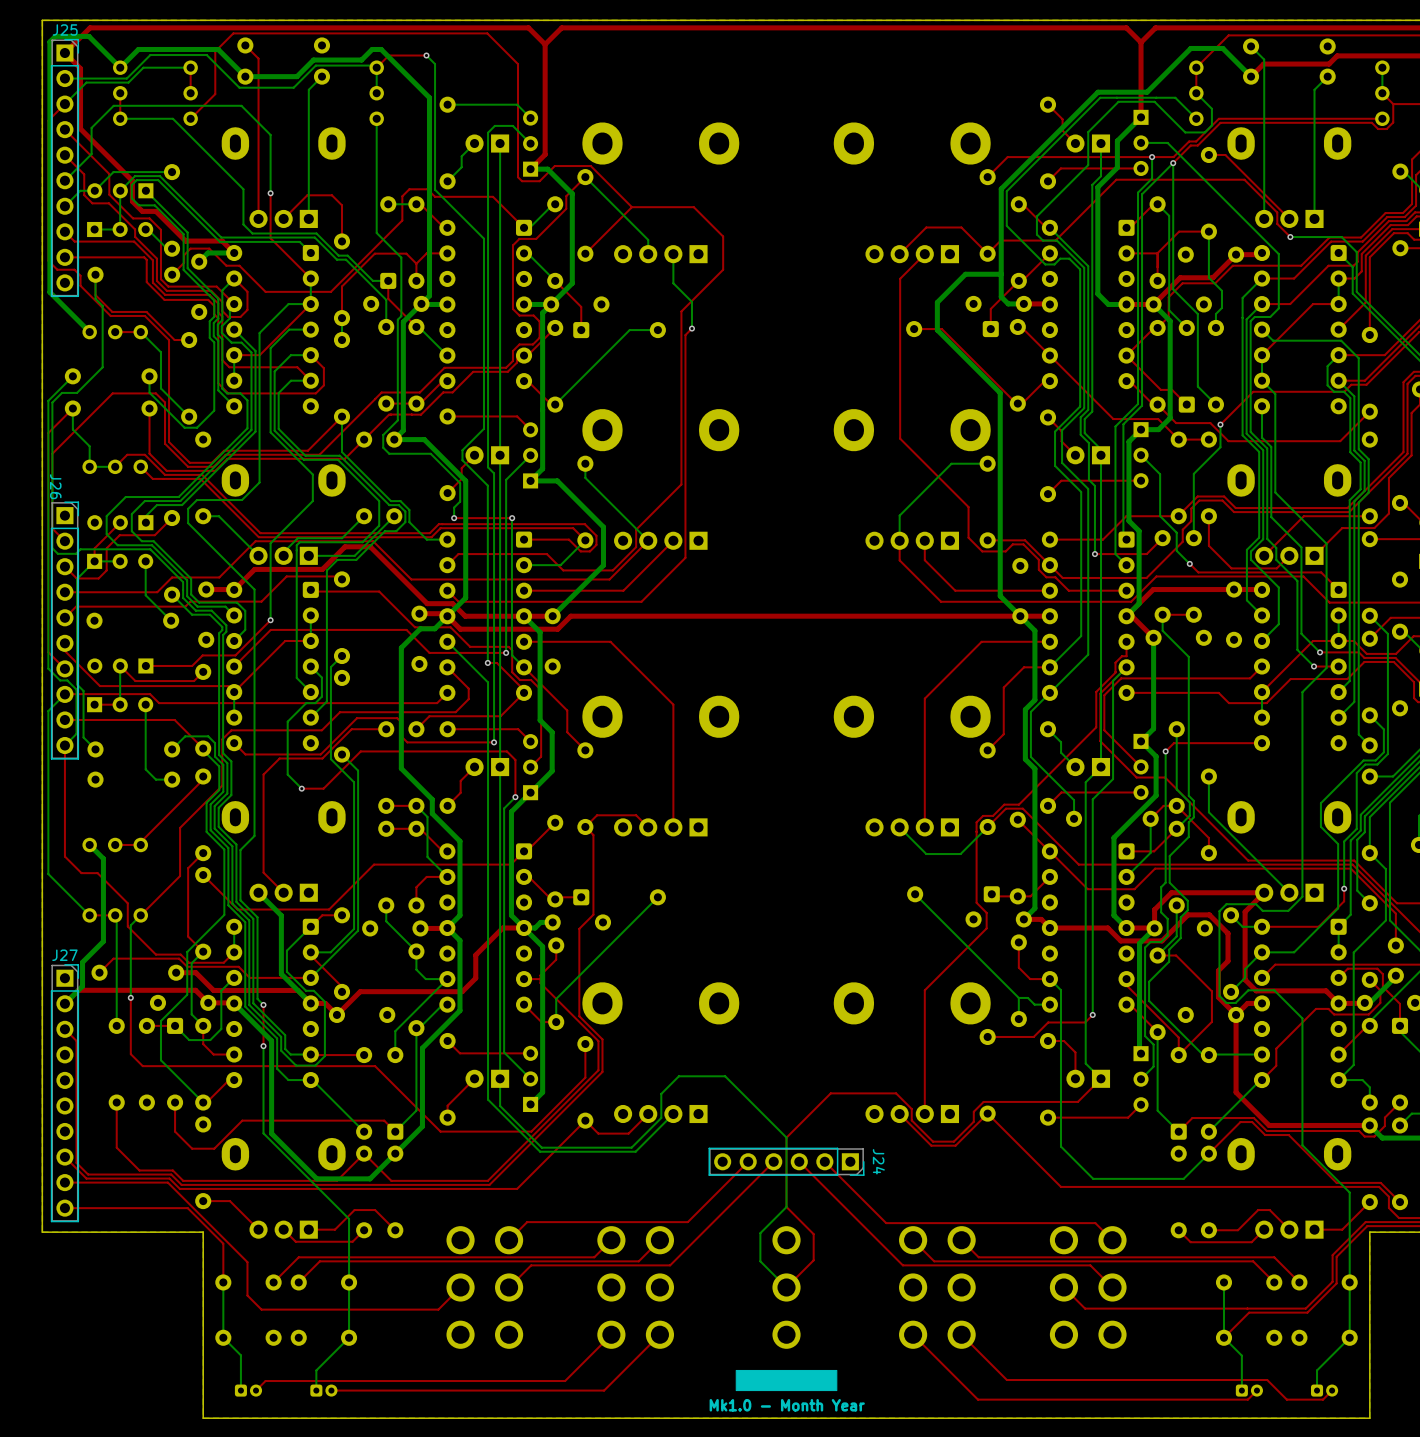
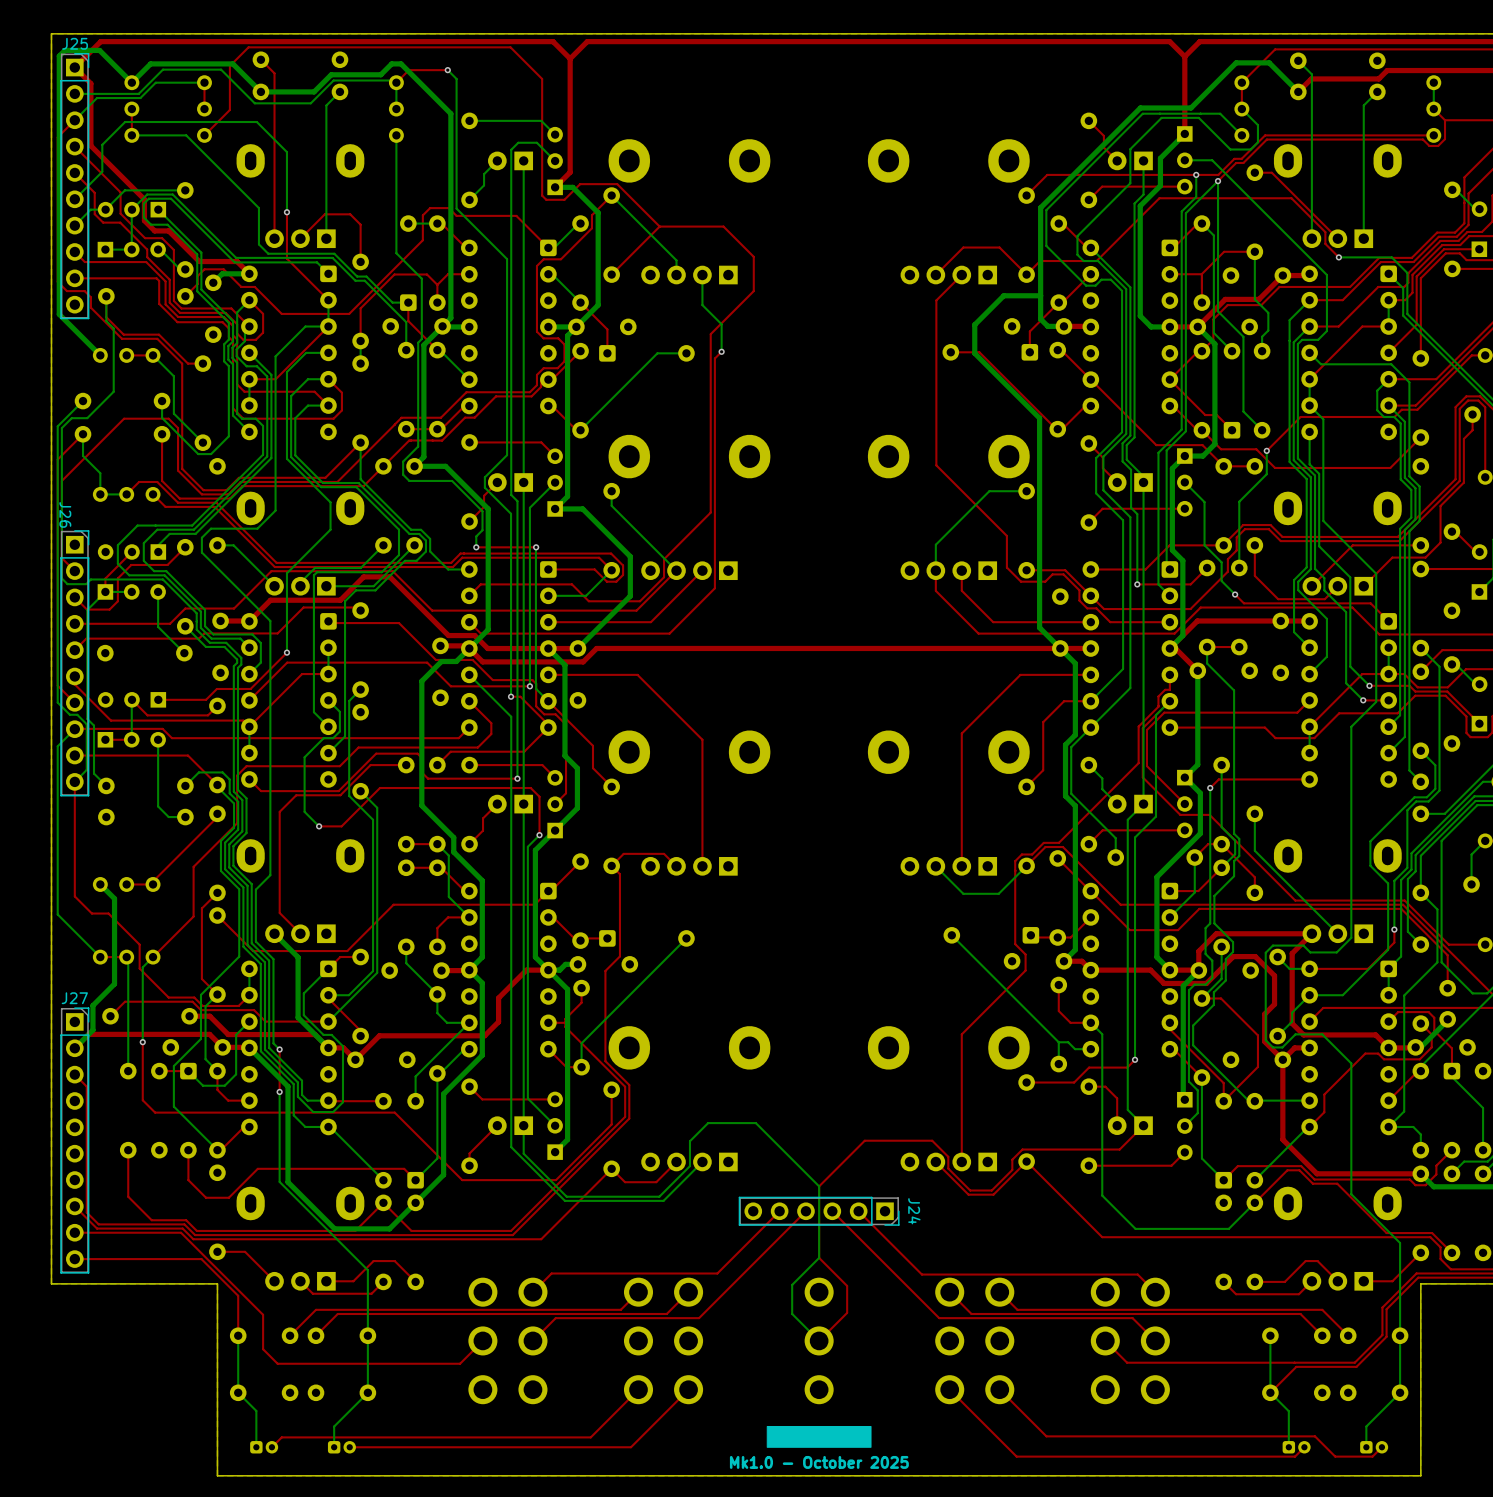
text: Mk1.0 - Month Year (787, 1405) -> Mk1.0 - October 2025 (819, 1462)

